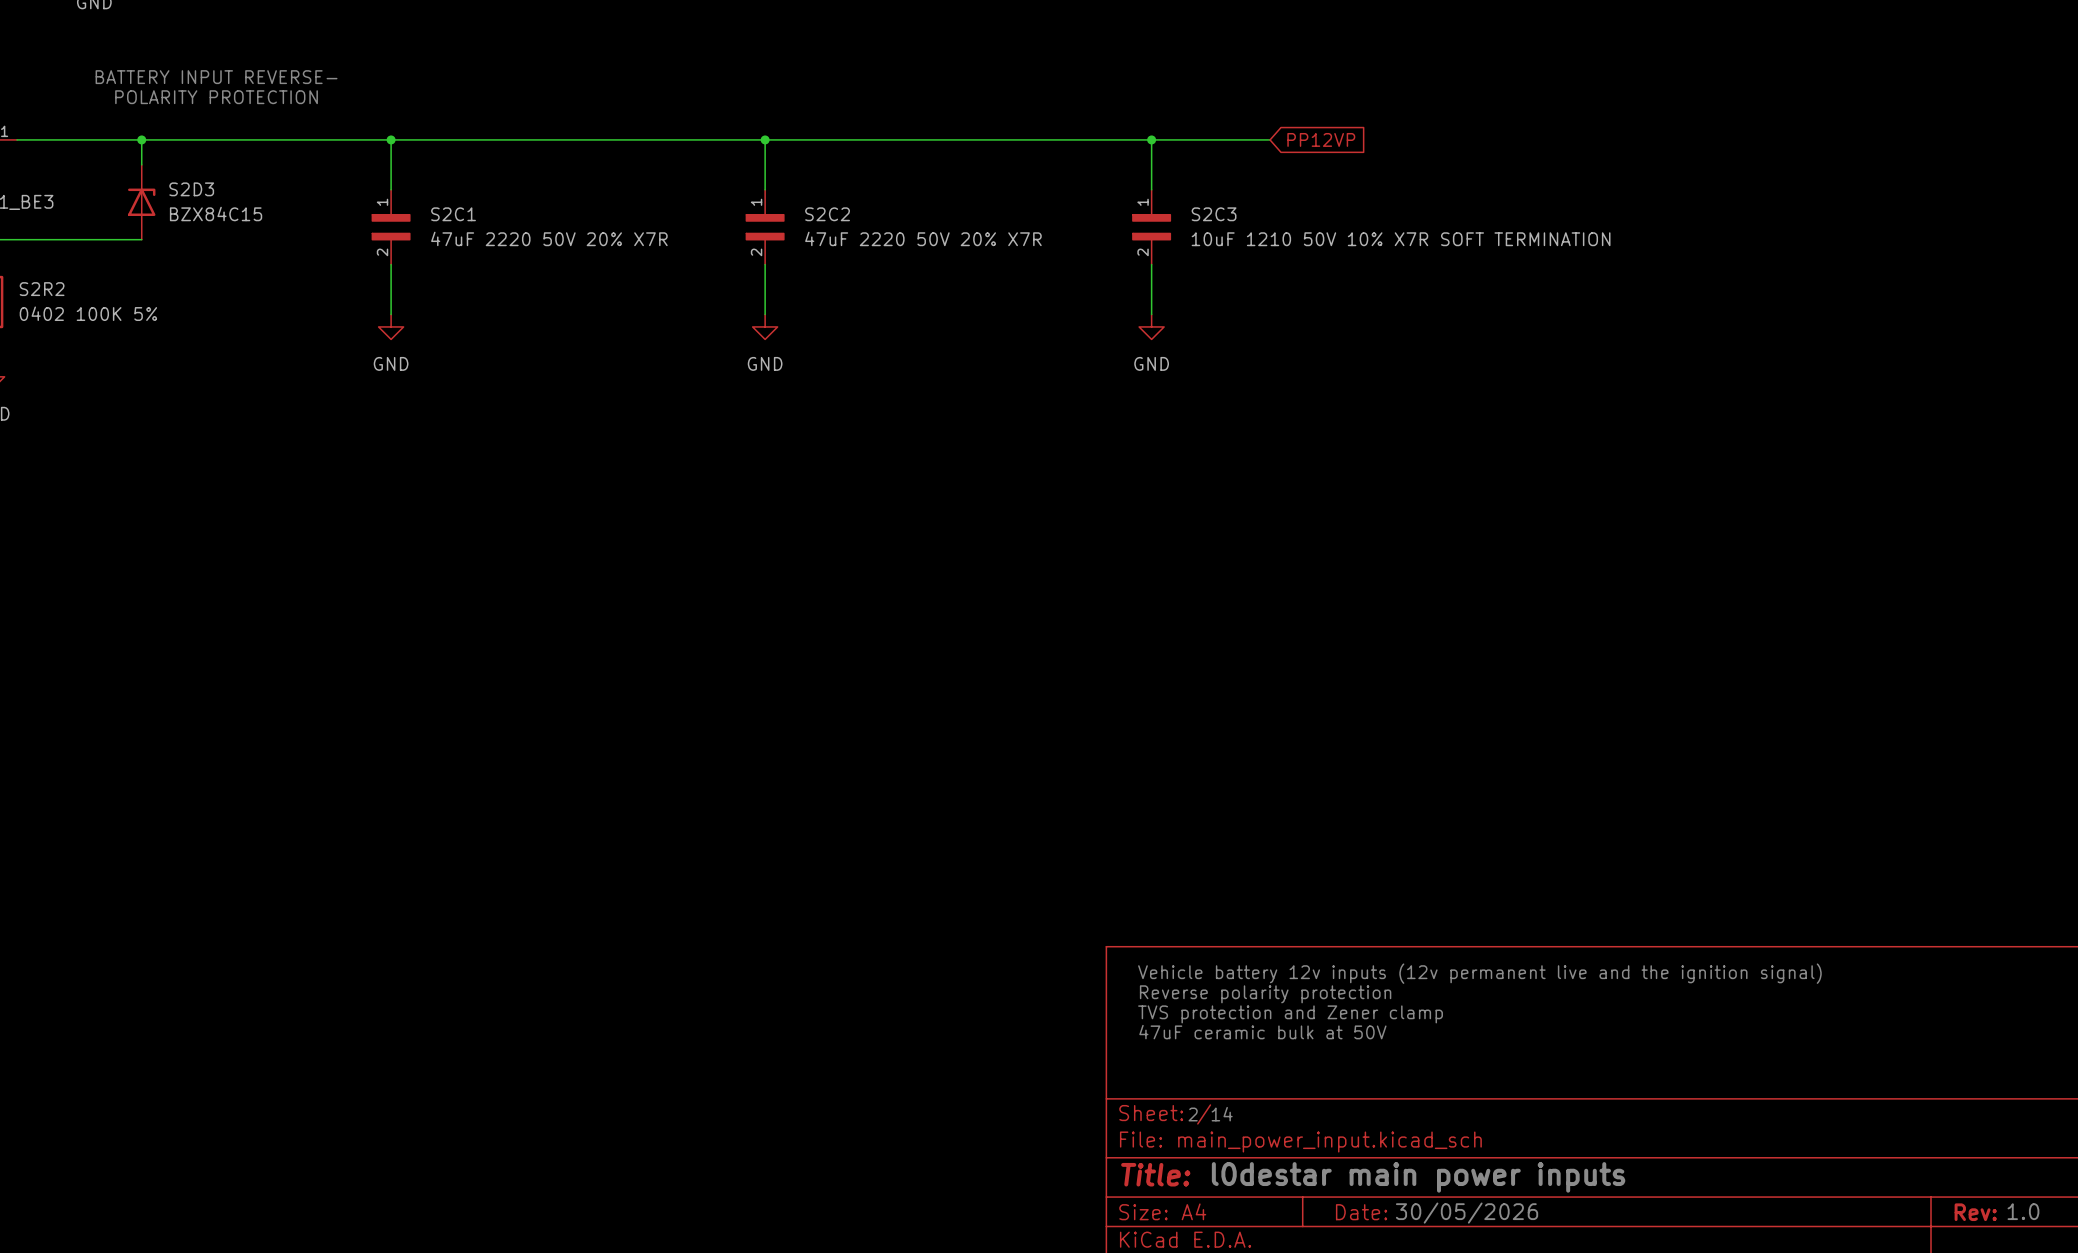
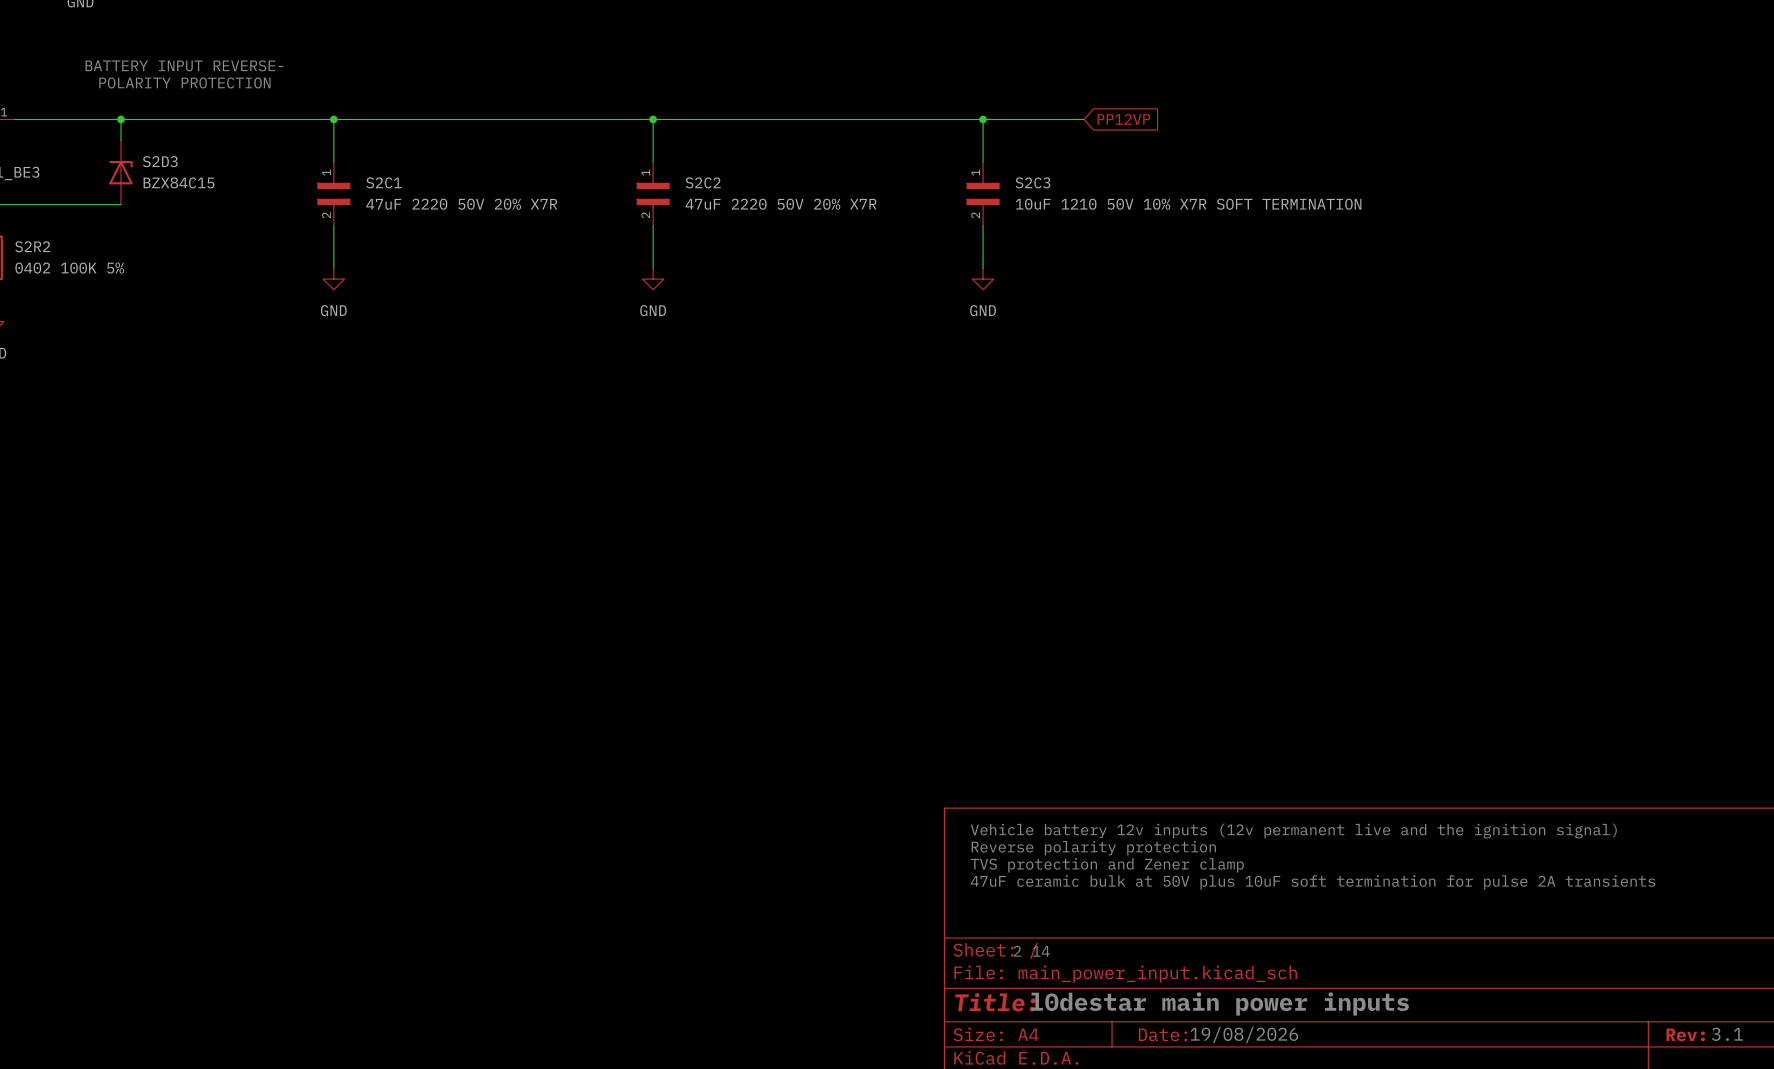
text: 47uF ceramic bulk at 50V (1262, 1032) -> 47uF ceramic bulk at 50V plus 10uF soft termination for pulse 2A transients (1313, 882)
text: 1.0 (2023, 1211) -> 3.1 (1727, 1034)
text: 30/05/2026 (1467, 1213) -> 19/08/2026 (1244, 1034)

